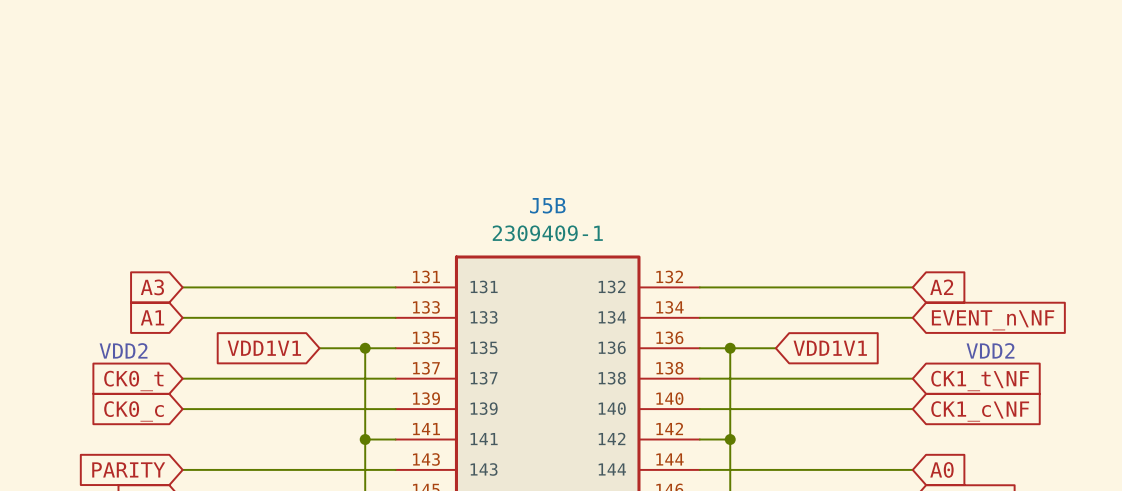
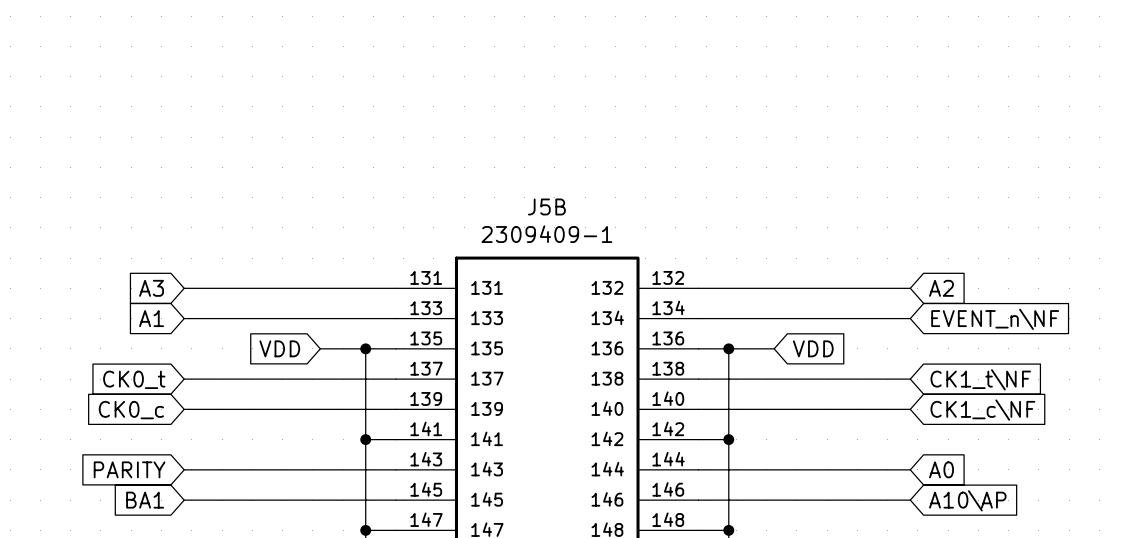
global label: VDD1V1 (264, 348) -> VDD (279, 348)
global label: VDD1V1 (830, 348) -> VDD (813, 348)
text: VDD2 (123, 350) -> none
text: VDD2 (990, 350) -> none

